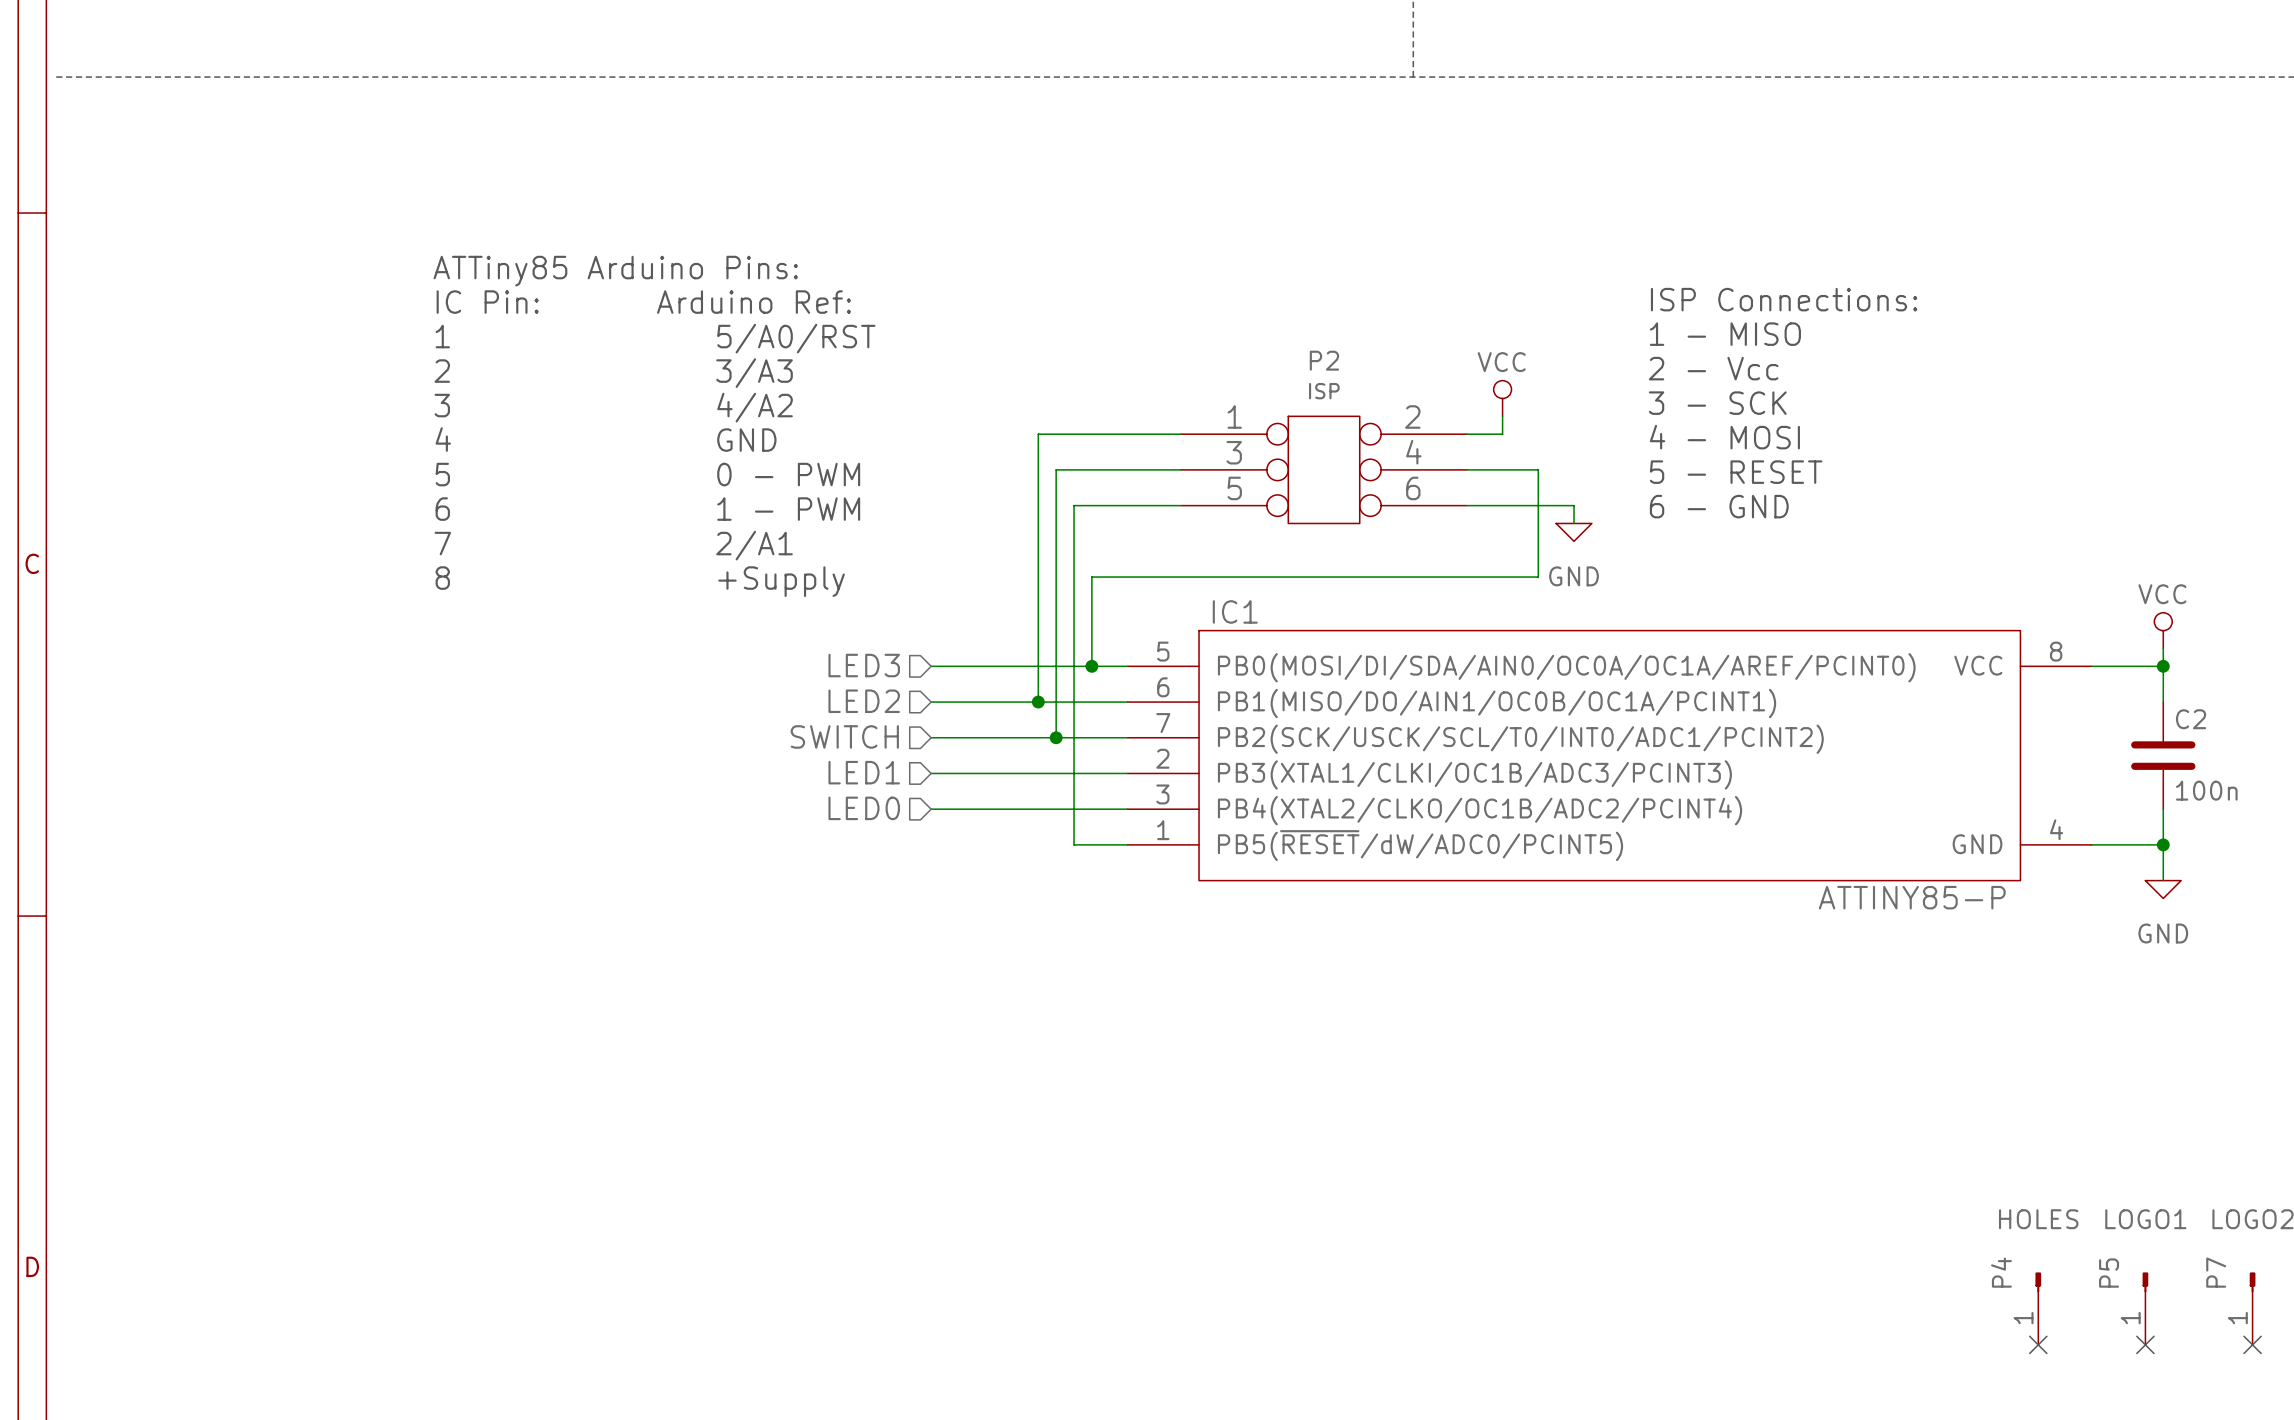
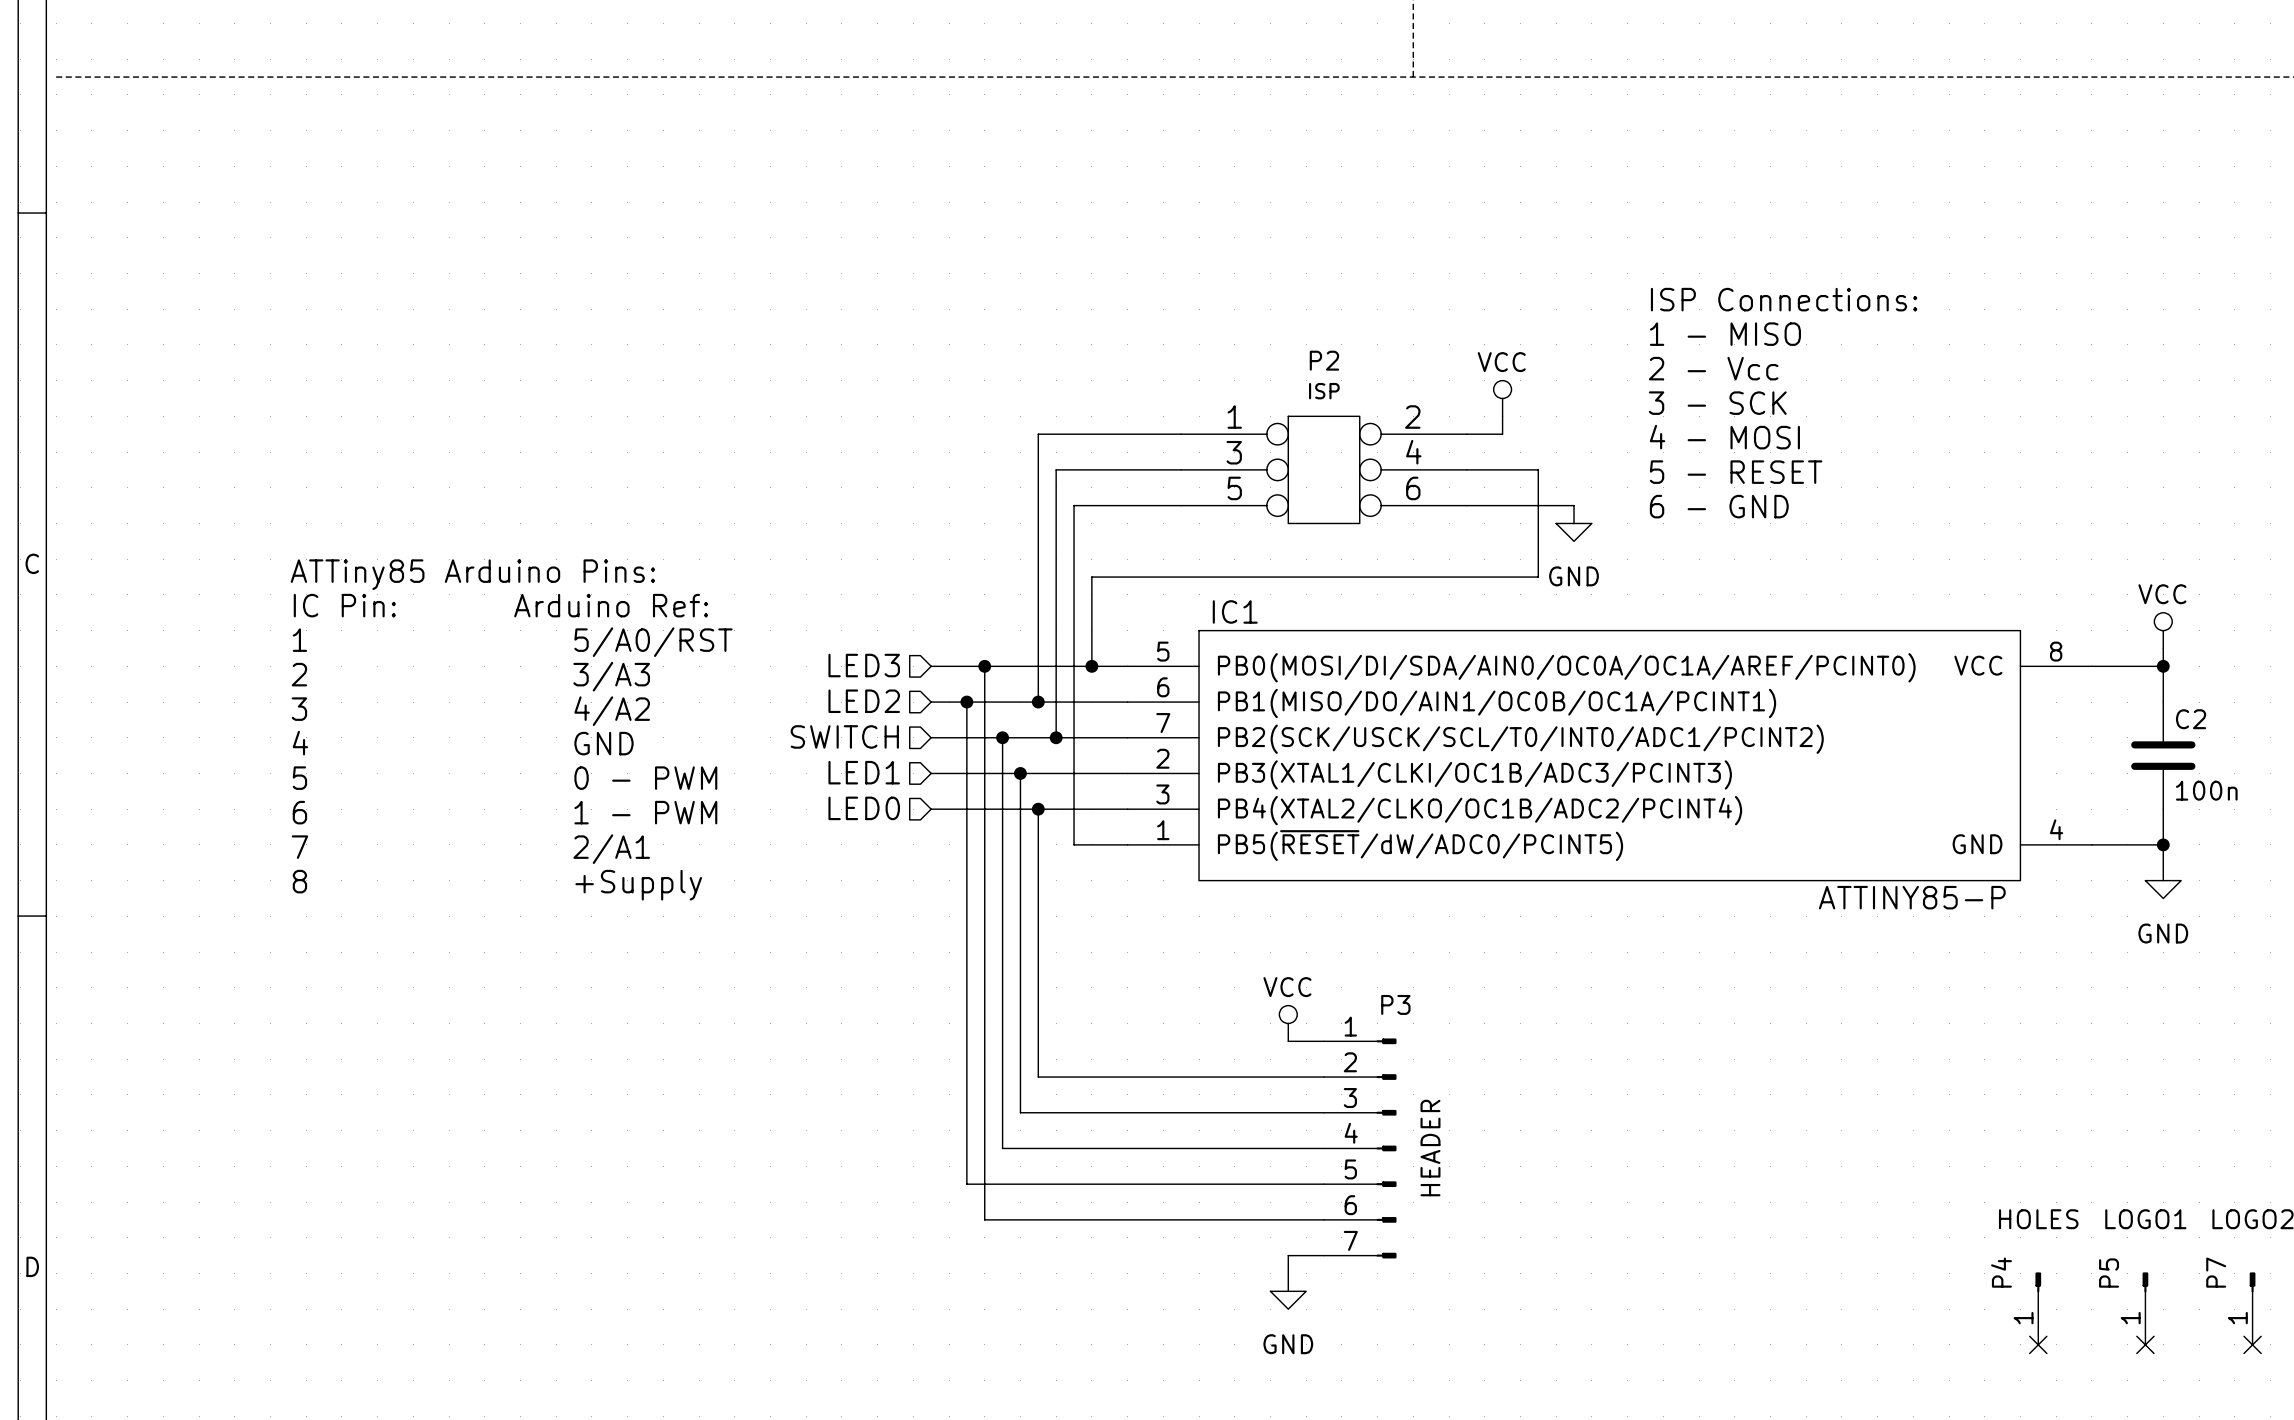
text position: ATTiny85 Arduino Pins: (615, 271) -> ATTiny85 Arduino Pins: (472, 574)
text position: IC Pin: Arduino Ref: (643, 302) -> IC Pin: Arduino Ref: (500, 605)
text position: 1 5/A0/RST (655, 338) -> 1 5/A0/RST (512, 642)
text position: 2 3/A3 (613, 373) -> 2 3/A3 (470, 676)
text position: 3 4/A2 (613, 407) -> 3 4/A2 (470, 711)
text position: 4 GND (606, 439) -> 4 GND (463, 743)
text position: 5 0 - PWM (647, 474) -> 5 0 - PWM (505, 778)
text position: 6 1 - PWM (647, 509) -> 6 1 - PWM (505, 812)
text position: 7 2/A1 (613, 545) -> 7 2/A1 (470, 849)
text position: 8 +Supply (640, 581) -> 8 +Supply (497, 885)
wire: none -> (984, 666) (984, 1219) (1324, 1219)
junction: none -> (984, 666)
wire: none -> (966, 702) (966, 1184) (1324, 1184)
junction: none -> (966, 702)
wire: none -> (1002, 737) (1002, 1148) (1324, 1148)
junction: none -> (1002, 737)
wire: none -> (1020, 773) (1020, 1112) (1324, 1112)
junction: none -> (1020, 773)
wire: none -> (1038, 809) (1038, 1077) (1324, 1077)
junction: none -> (1038, 809)
power symbol: none -> VCC (1288, 1023)
wire: none -> (1288, 1041) (1324, 1041)
P3: none -> HEADER (1360, 1148)
wire: none -> (1324, 1255) (1288, 1255) (1288, 1291)
power symbol: none -> GND (1288, 1300)

